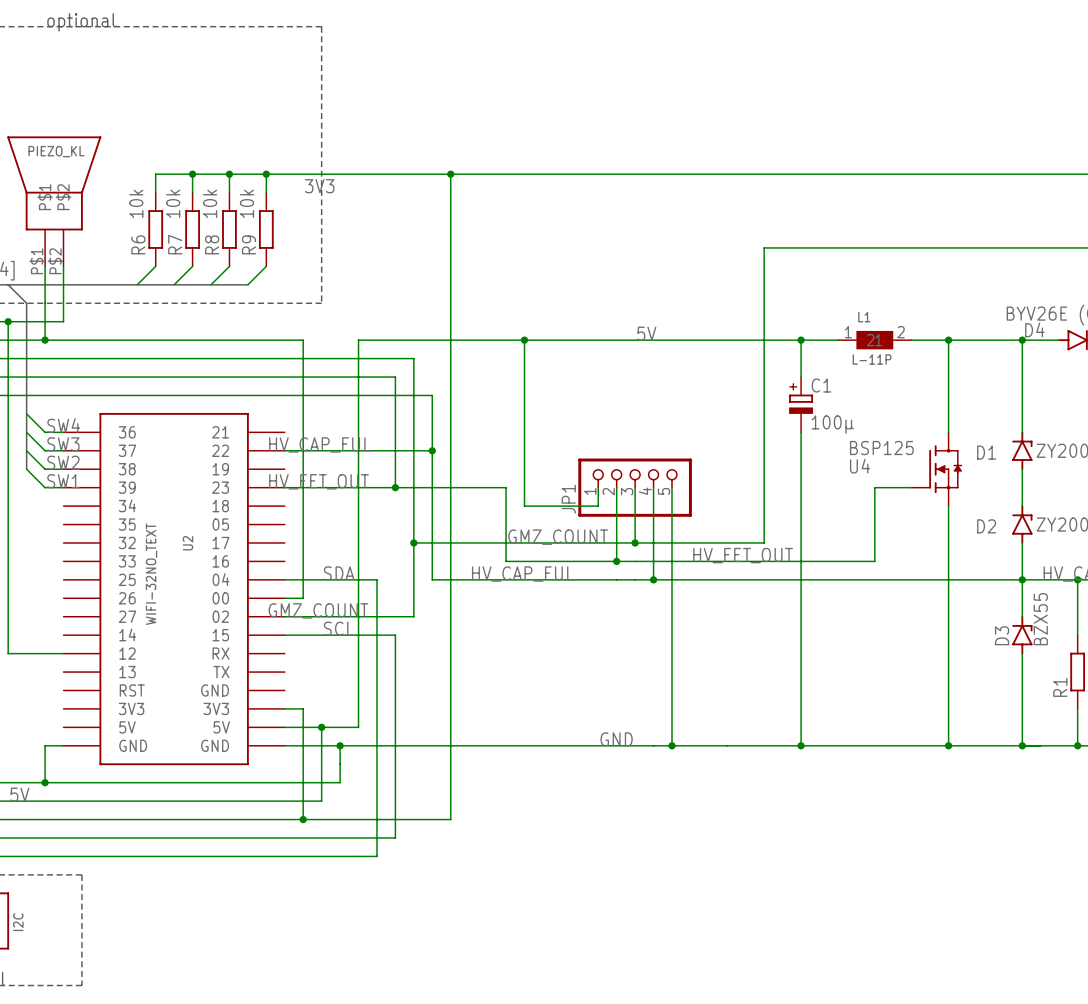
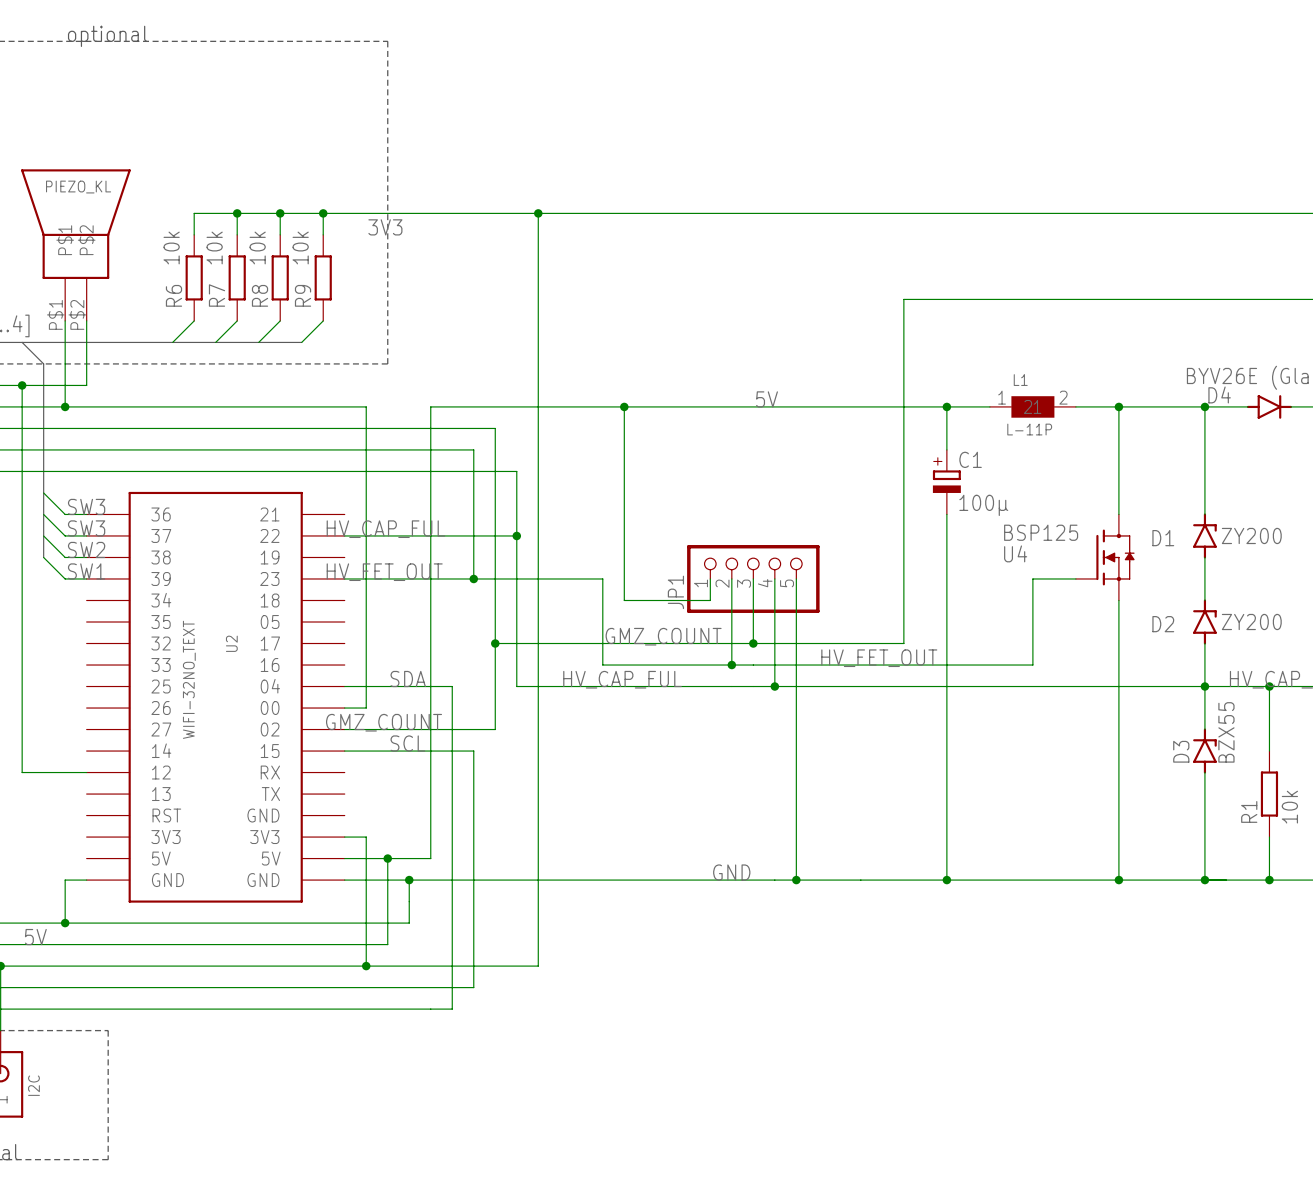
label: SW4 (63, 425) -> SW3 (86, 506)

